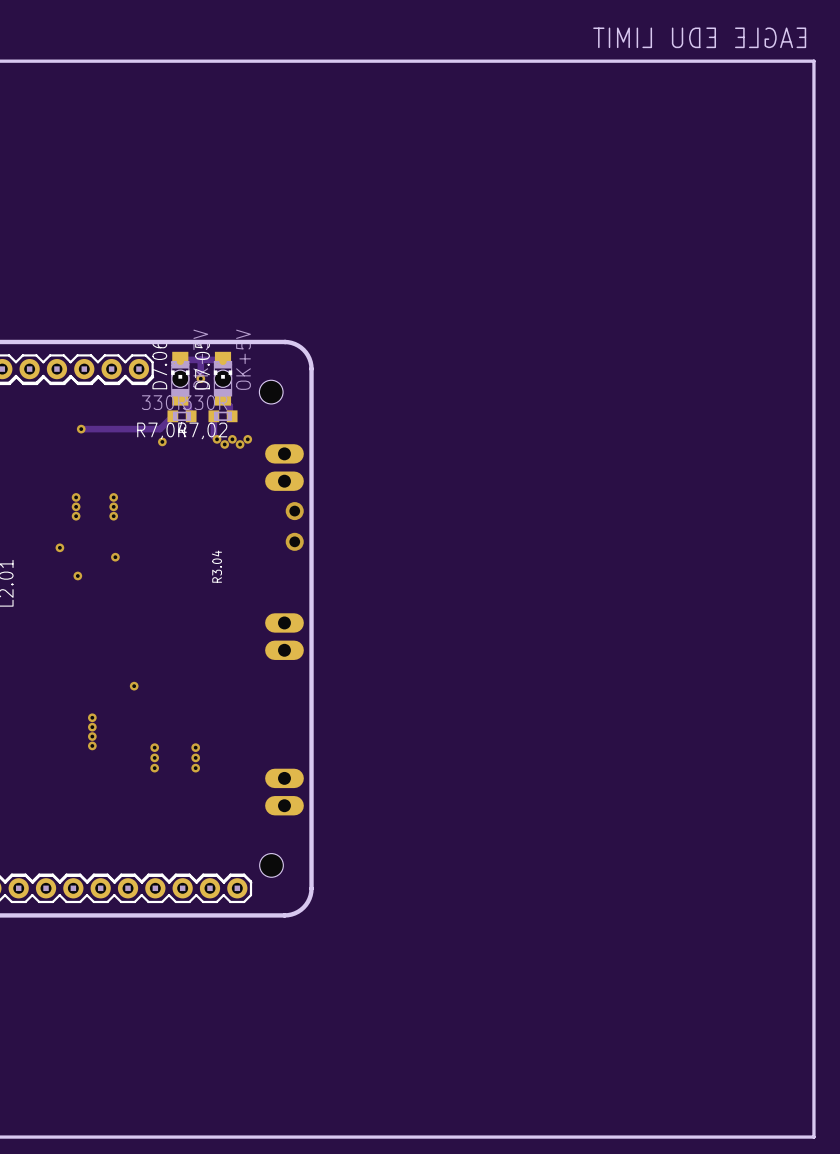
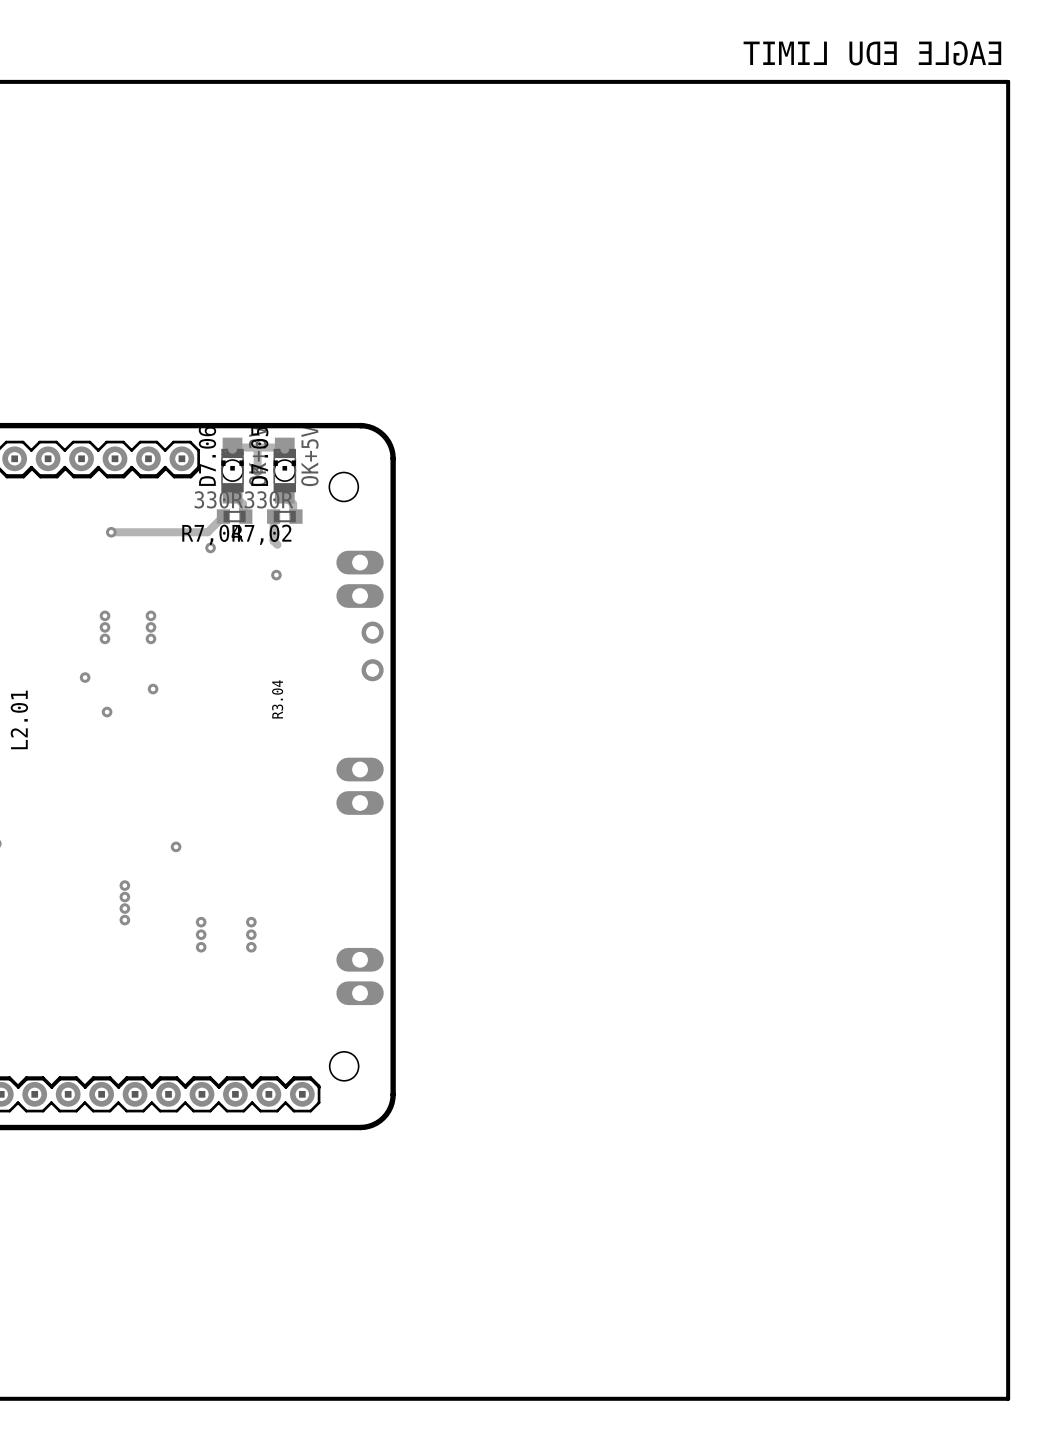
via: (217, 439) -> none
via: (232, 439) -> none
via: (247, 439) -> none
via: (224, 444) -> none
via: (240, 444) -> none
via: none -> (276, 575)

